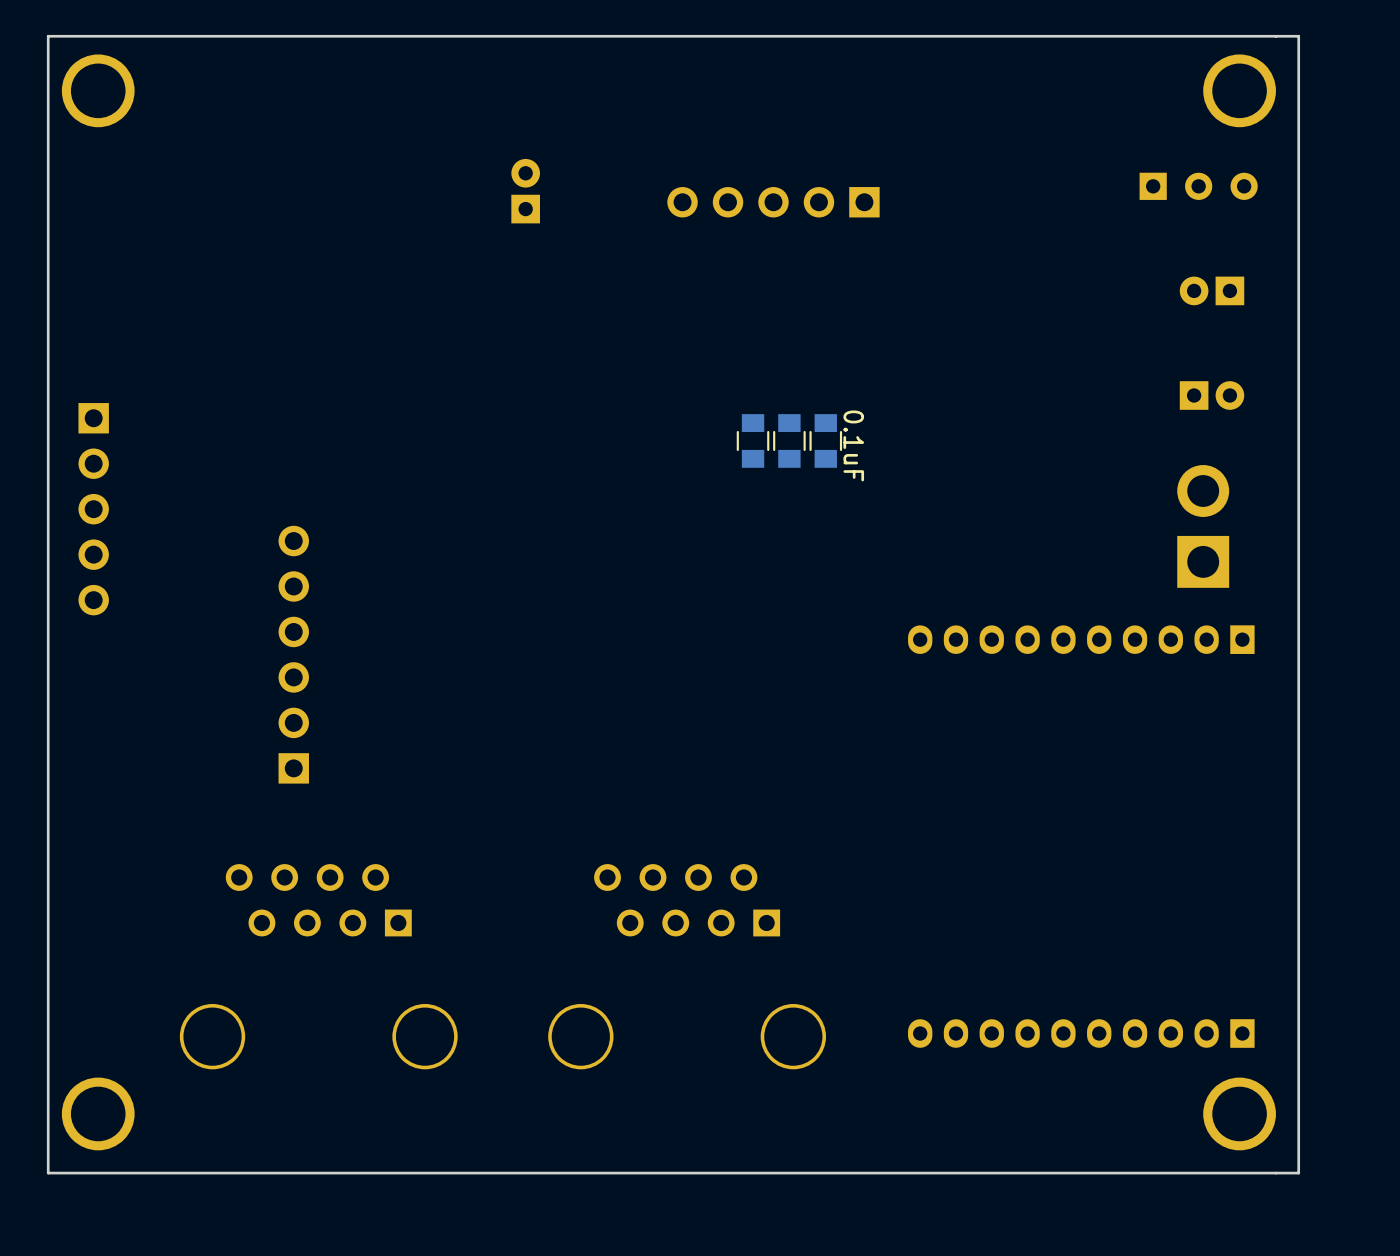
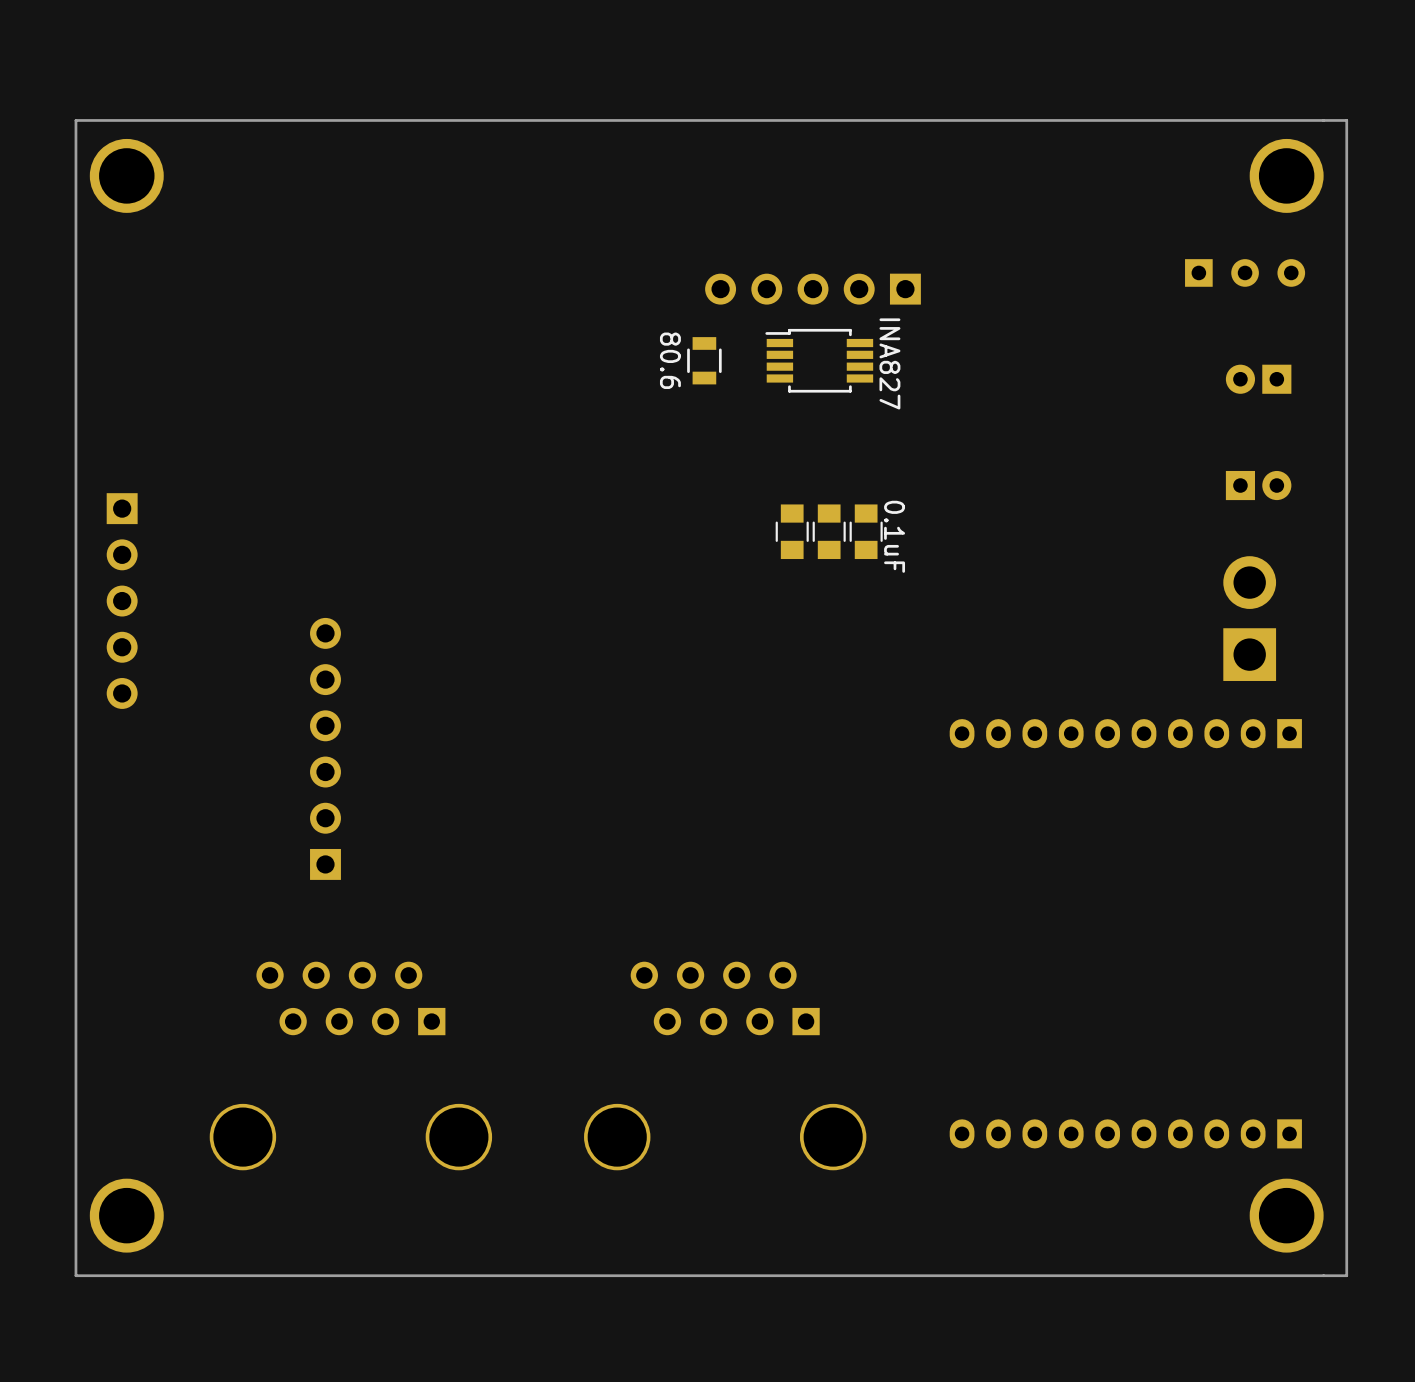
part: (525, 191) -> none
part: none -> 80.6 (704, 360)
part: none -> INA827 (819, 360)

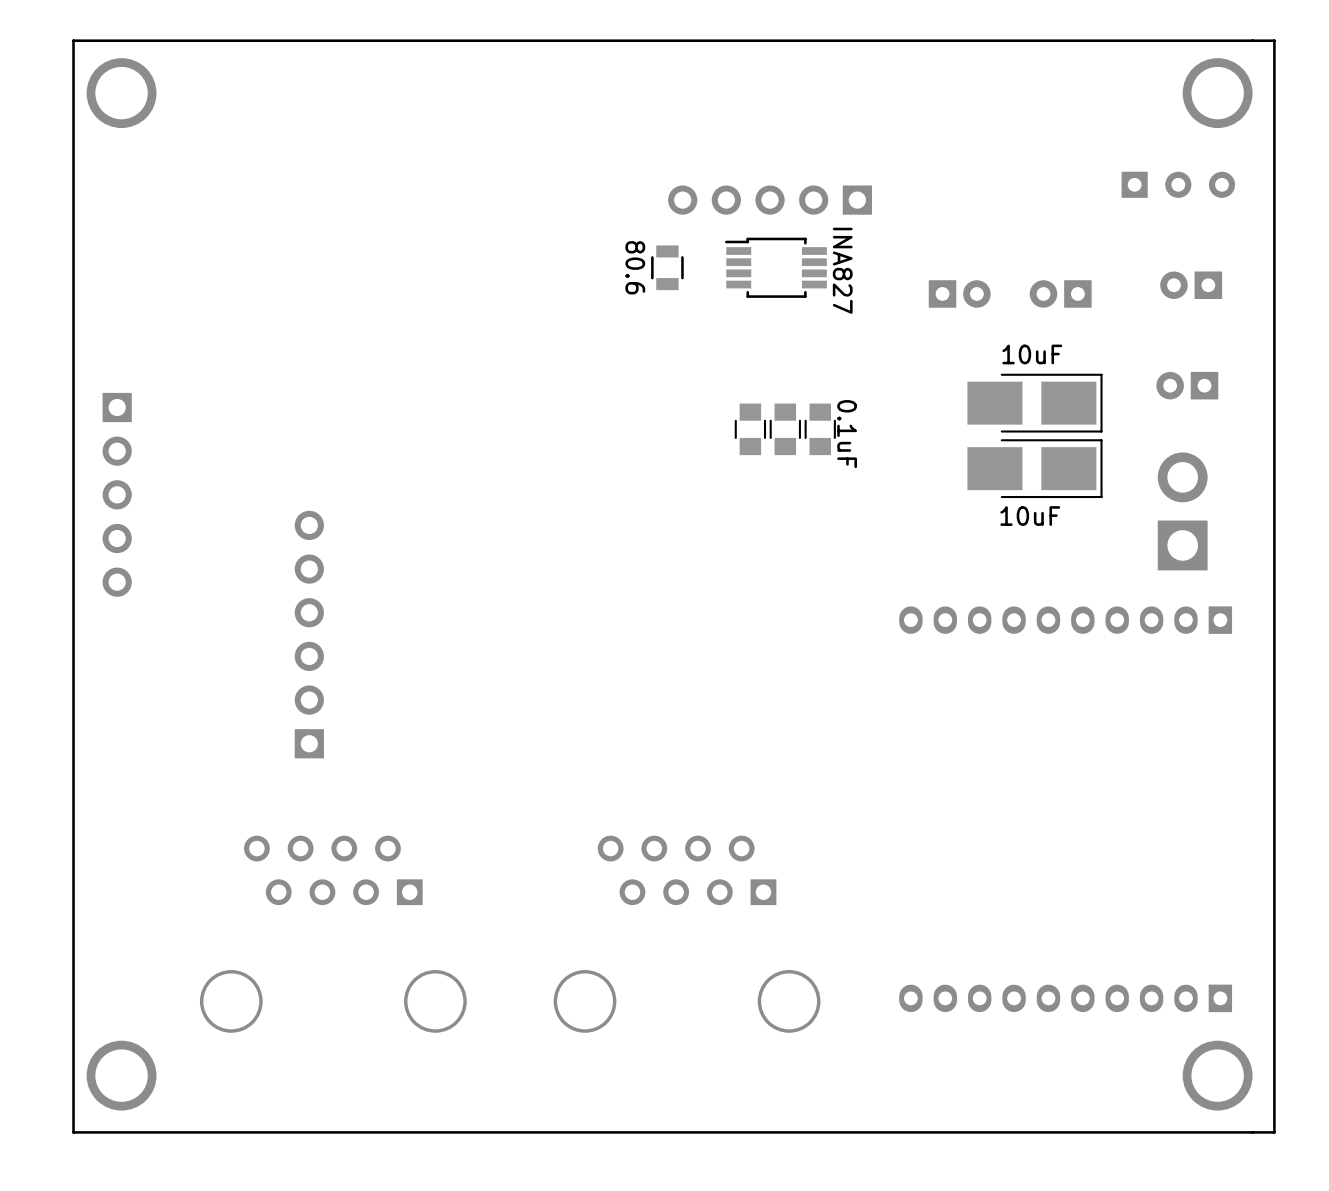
part: none -> (959, 293)
part: none -> (1060, 293)
part rotation: 0° (1258, 485) -> 180° (1187, 385)
part: none -> 10uF (1034, 403)
part: none -> 10uF (1034, 468)

